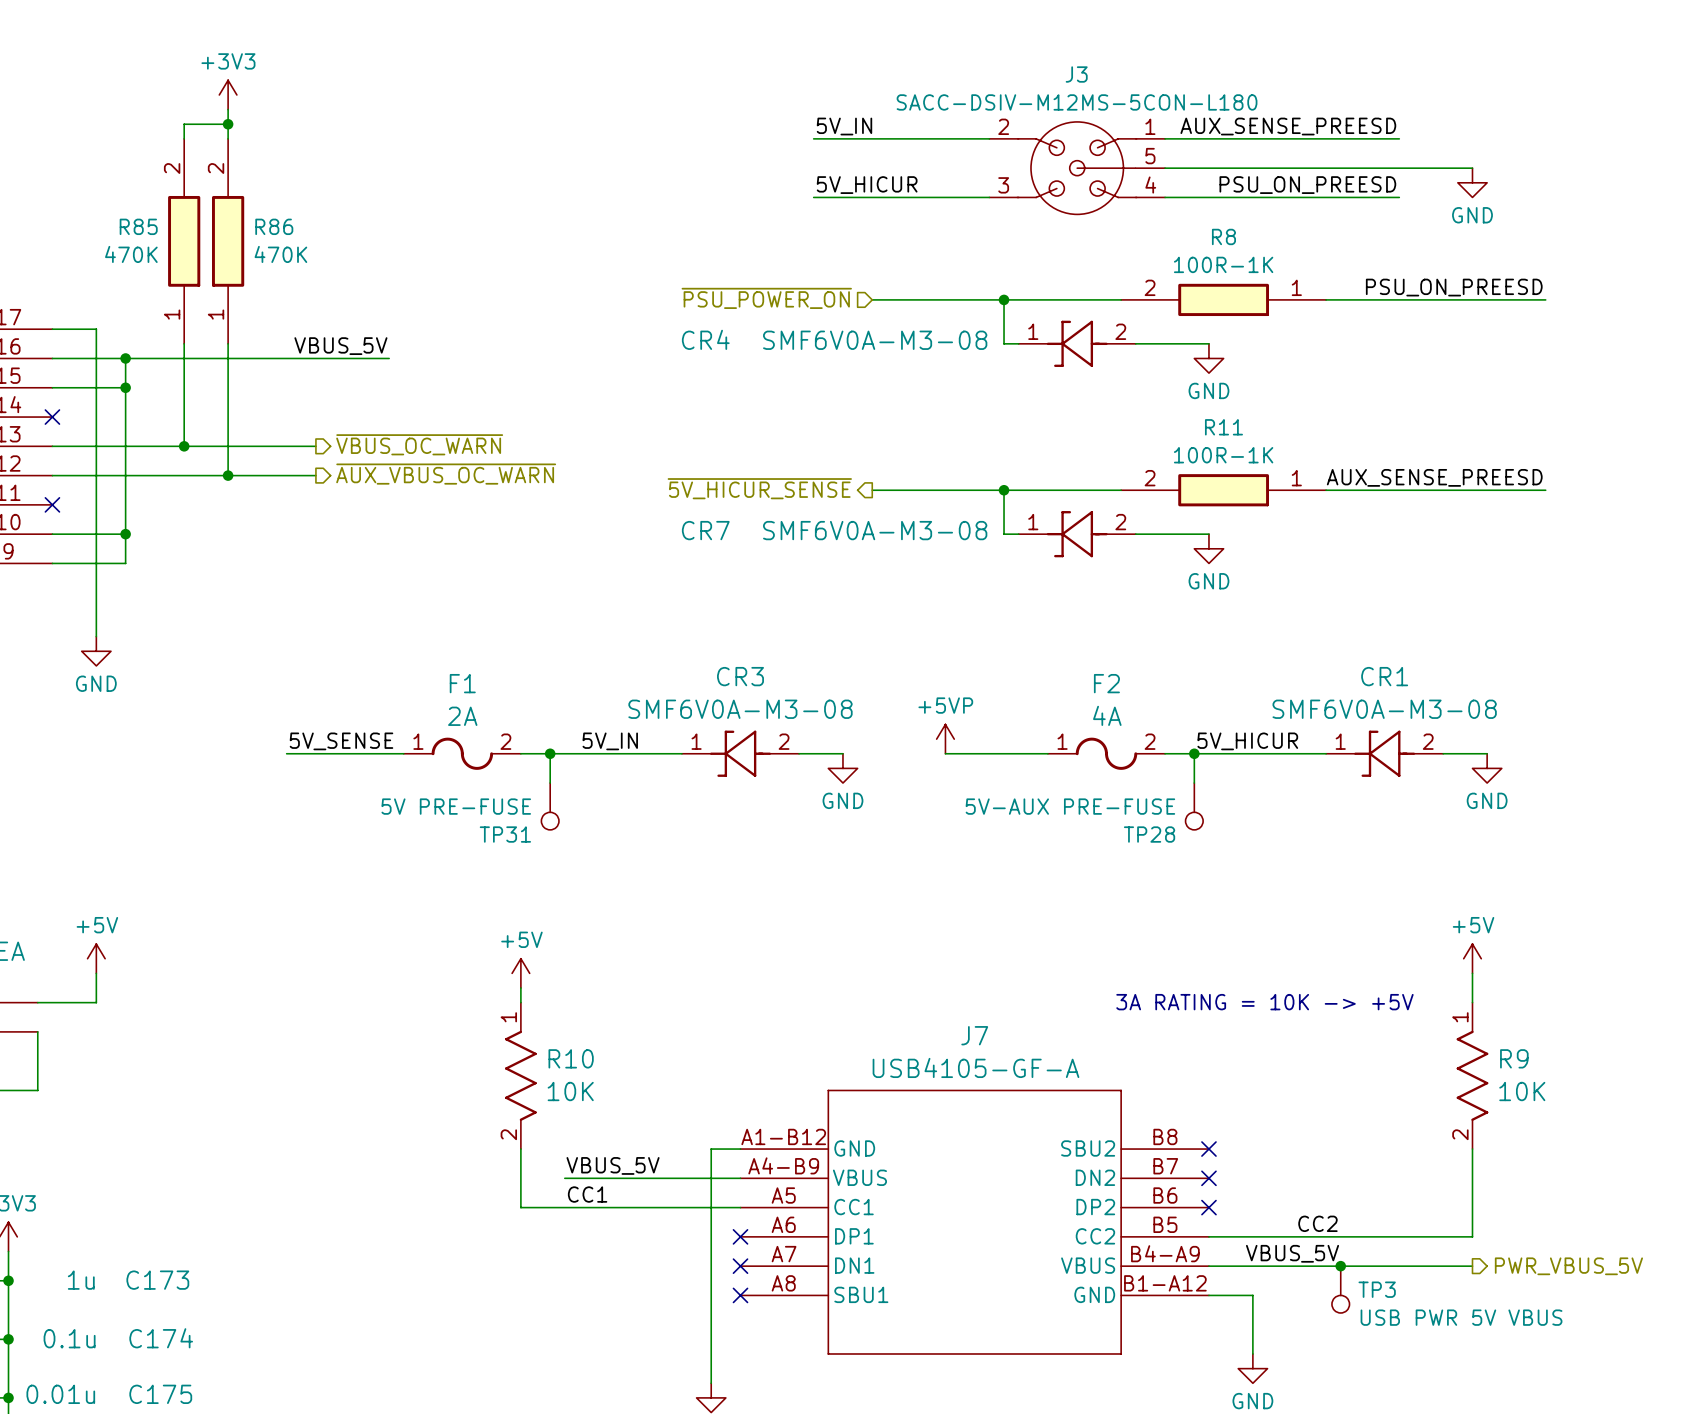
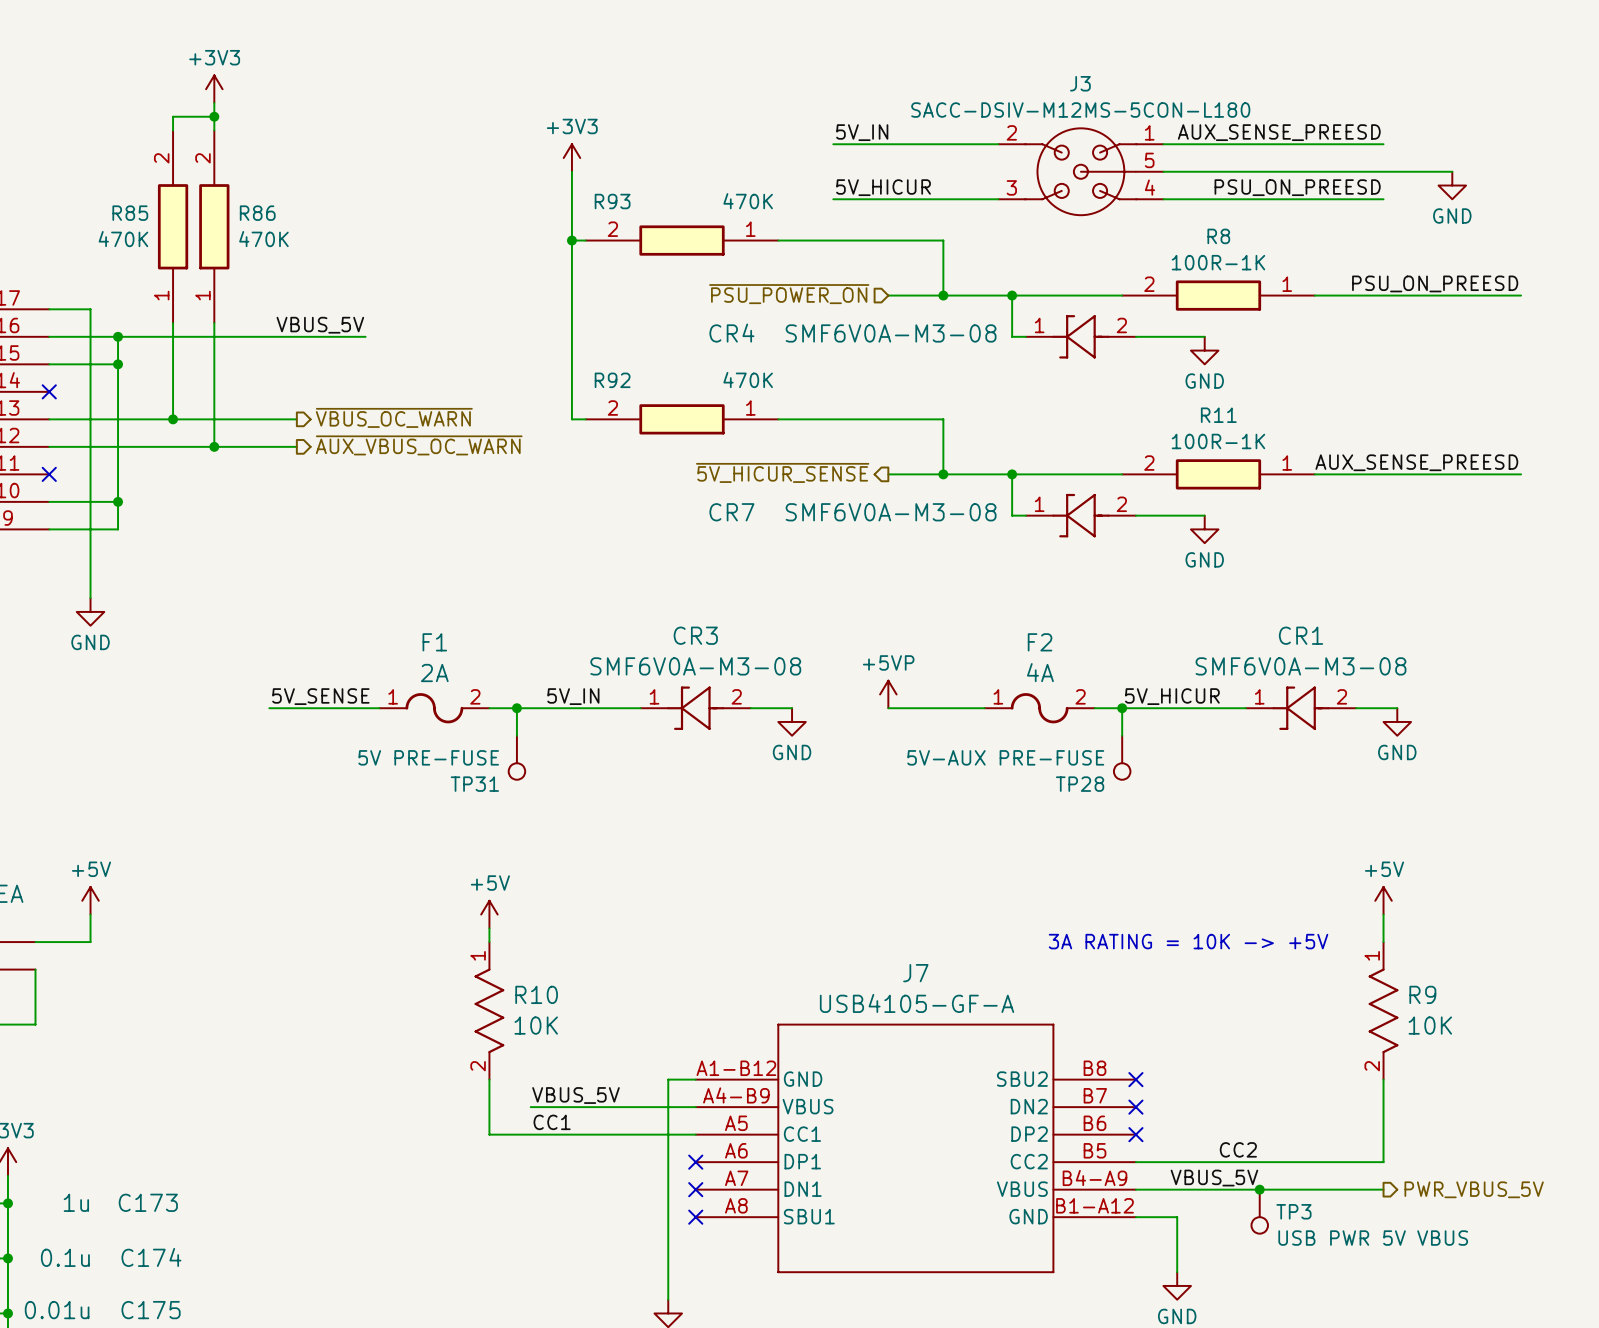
label position: 5V_IN (844, 126) -> 5V_IN (862, 132)
label position: AUX_SENSE_PREESD (1288, 126) -> AUX_SENSE_PREESD (1279, 132)
wire: (813, 138) (989, 138) -> (833, 144) (998, 144)
wire: (1165, 138) (1399, 138) -> (1163, 144) (1383, 144)
power symbol: none -> +3V3 (571, 158)
J3 position: (1077, 168) -> (1080, 171)
wire: (1165, 168) (1472, 168) -> (1163, 171) (1452, 171)
wire: none -> (571, 171) (571, 419) (585, 419)
power symbol position: GND (1472, 182) -> GND (1452, 185)
label position: 5V_HICUR (867, 185) -> 5V_HICUR (883, 187)
label position: PSU_ON_PREESD (1307, 185) -> PSU_ON_PREESD (1297, 187)
wire: (813, 197) (989, 197) -> (833, 199) (998, 199)
wire: (1165, 197) (1399, 197) -> (1163, 199) (1383, 199)
wire: none -> (571, 240) (585, 240)
junction: none -> (571, 240)
R93: none -> 470K (682, 240)
wire: none -> (778, 240) (943, 240) (943, 281)
label position: PSU_ON_PREESD (1454, 287) -> PSU_ON_PREESD (1435, 283)
hierarchical label position: ~{PSU_POWER_ON} (766, 298) -> ~{PSU_POWER_ON} (789, 294)
wire: (872, 299) (1121, 299) -> (888, 295) (1122, 295)
junction position: (1004, 299) -> (943, 295)
R8 position: (1223, 299) -> (1218, 295)
wire: (1326, 299) (1545, 299) -> (1314, 295) (1521, 295)
wire: (1004, 314) (1004, 343) (1018, 343) -> none
wire: none -> (1012, 295) (1012, 336) (1025, 336)
junction: none -> (1012, 295)
CR4 position: (1077, 343) -> (1080, 336)
wire: (1135, 343) (1208, 343) -> (1135, 336) (1204, 336)
power symbol position: GND (1208, 358) -> GND (1204, 350)
R92: none -> 470K (682, 419)
wire: none -> (778, 419) (943, 419) (943, 460)
label position: AUX_SENSE_PREESD (1434, 477) -> AUX_SENSE_PREESD (1416, 462)
hierarchical label position: ~{5V_HICUR_SENSE} (759, 488) -> ~{5V_HICUR_SENSE} (782, 472)
wire: (872, 490) (1121, 490) -> (888, 474) (1122, 474)
junction position: (1004, 490) -> (943, 474)
R11 position: (1223, 490) -> (1218, 474)
wire: (1326, 490) (1545, 490) -> (1314, 474) (1521, 474)
wire: (1004, 504) (1004, 534) (1018, 534) -> none
wire: none -> (1012, 474) (1012, 515) (1025, 515)
junction: none -> (1012, 474)
CR7 position: (1077, 534) -> (1080, 515)
wire: (1135, 534) (1208, 534) -> (1135, 515) (1204, 515)
power symbol position: GND (1208, 548) -> GND (1204, 529)

